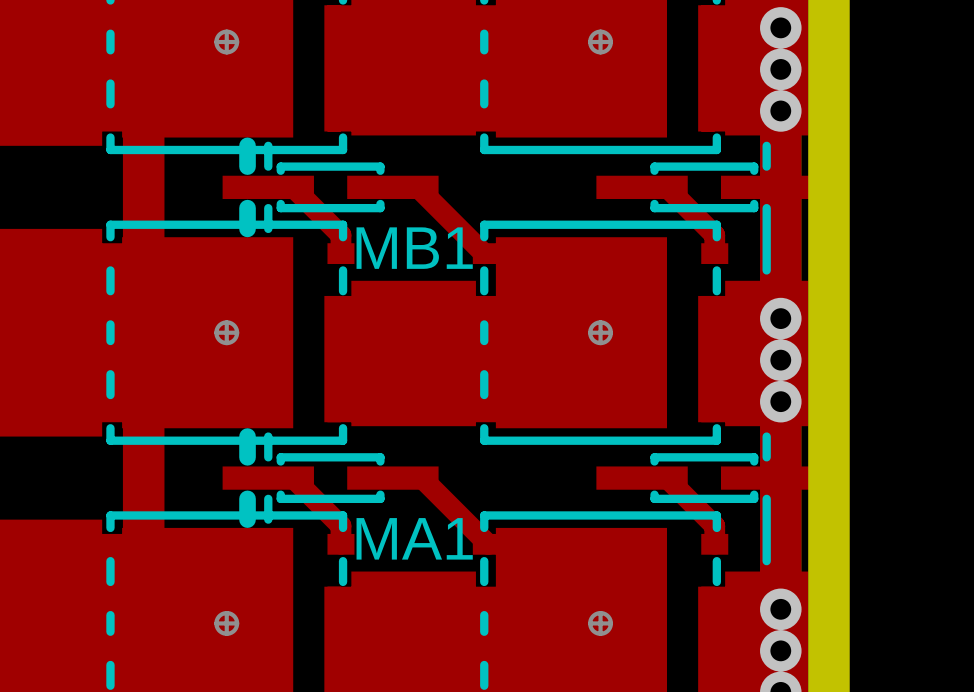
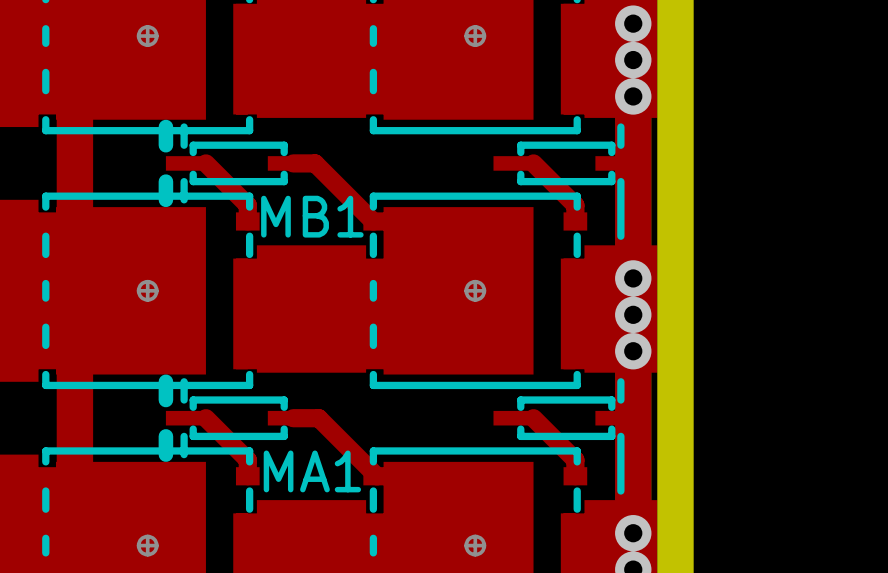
part footprint: [222, 162, 439, 213] -> [165, 141, 312, 186]
part footprint: [596, 162, 813, 213] -> [493, 141, 640, 186]
part footprint: [222, 453, 439, 504] -> [165, 396, 312, 441]
part footprint: [596, 453, 813, 504] -> [493, 396, 640, 441]

